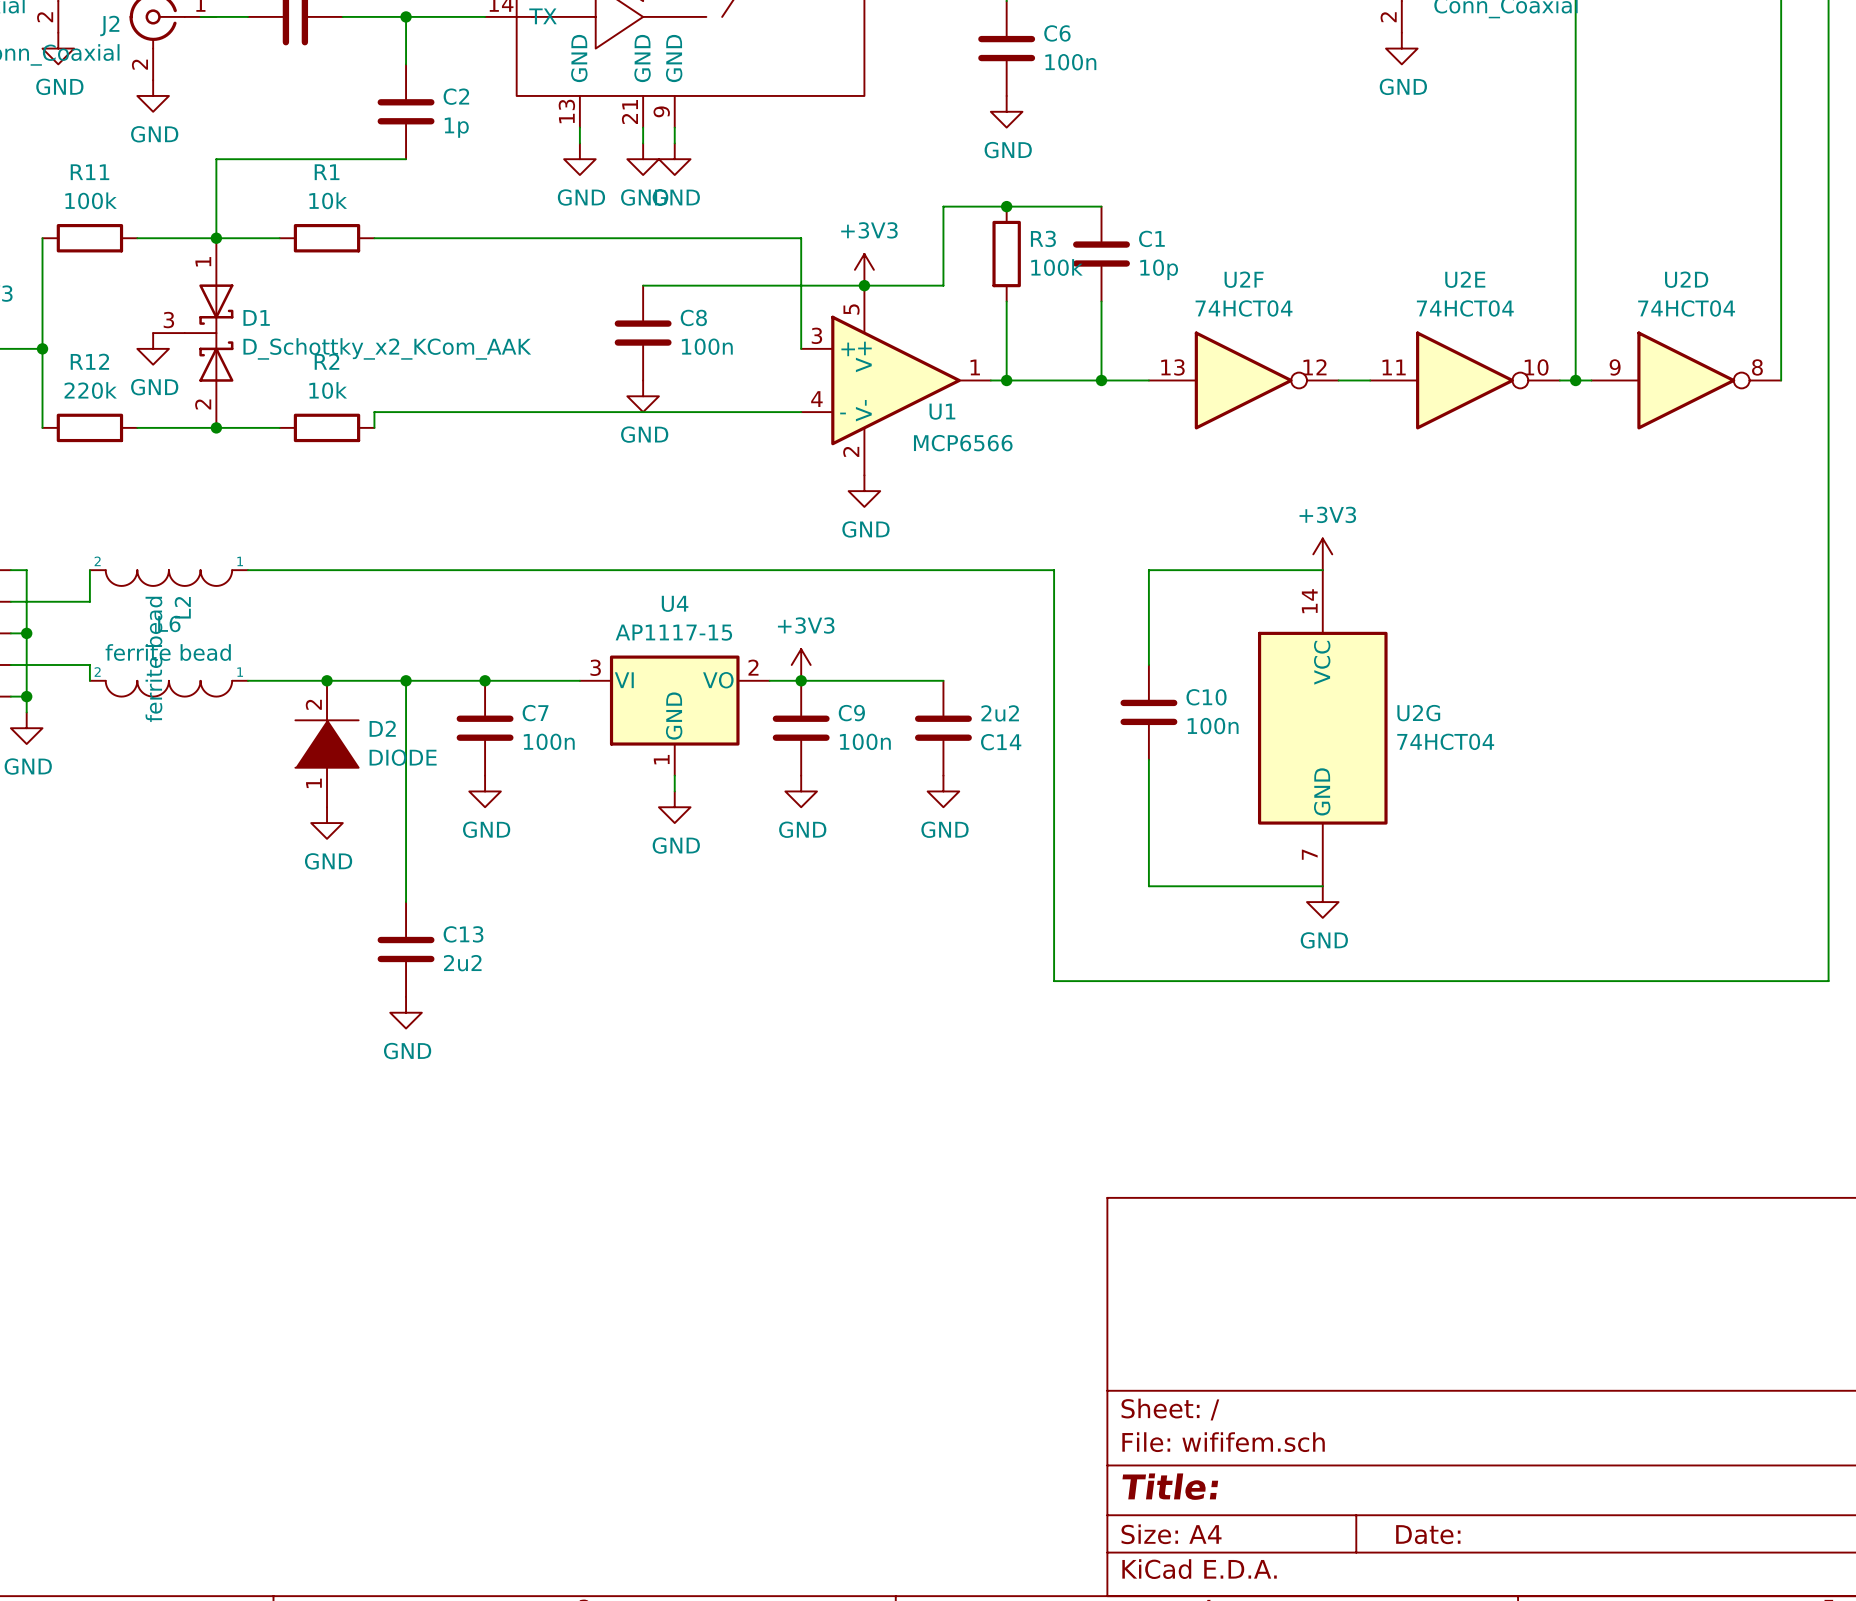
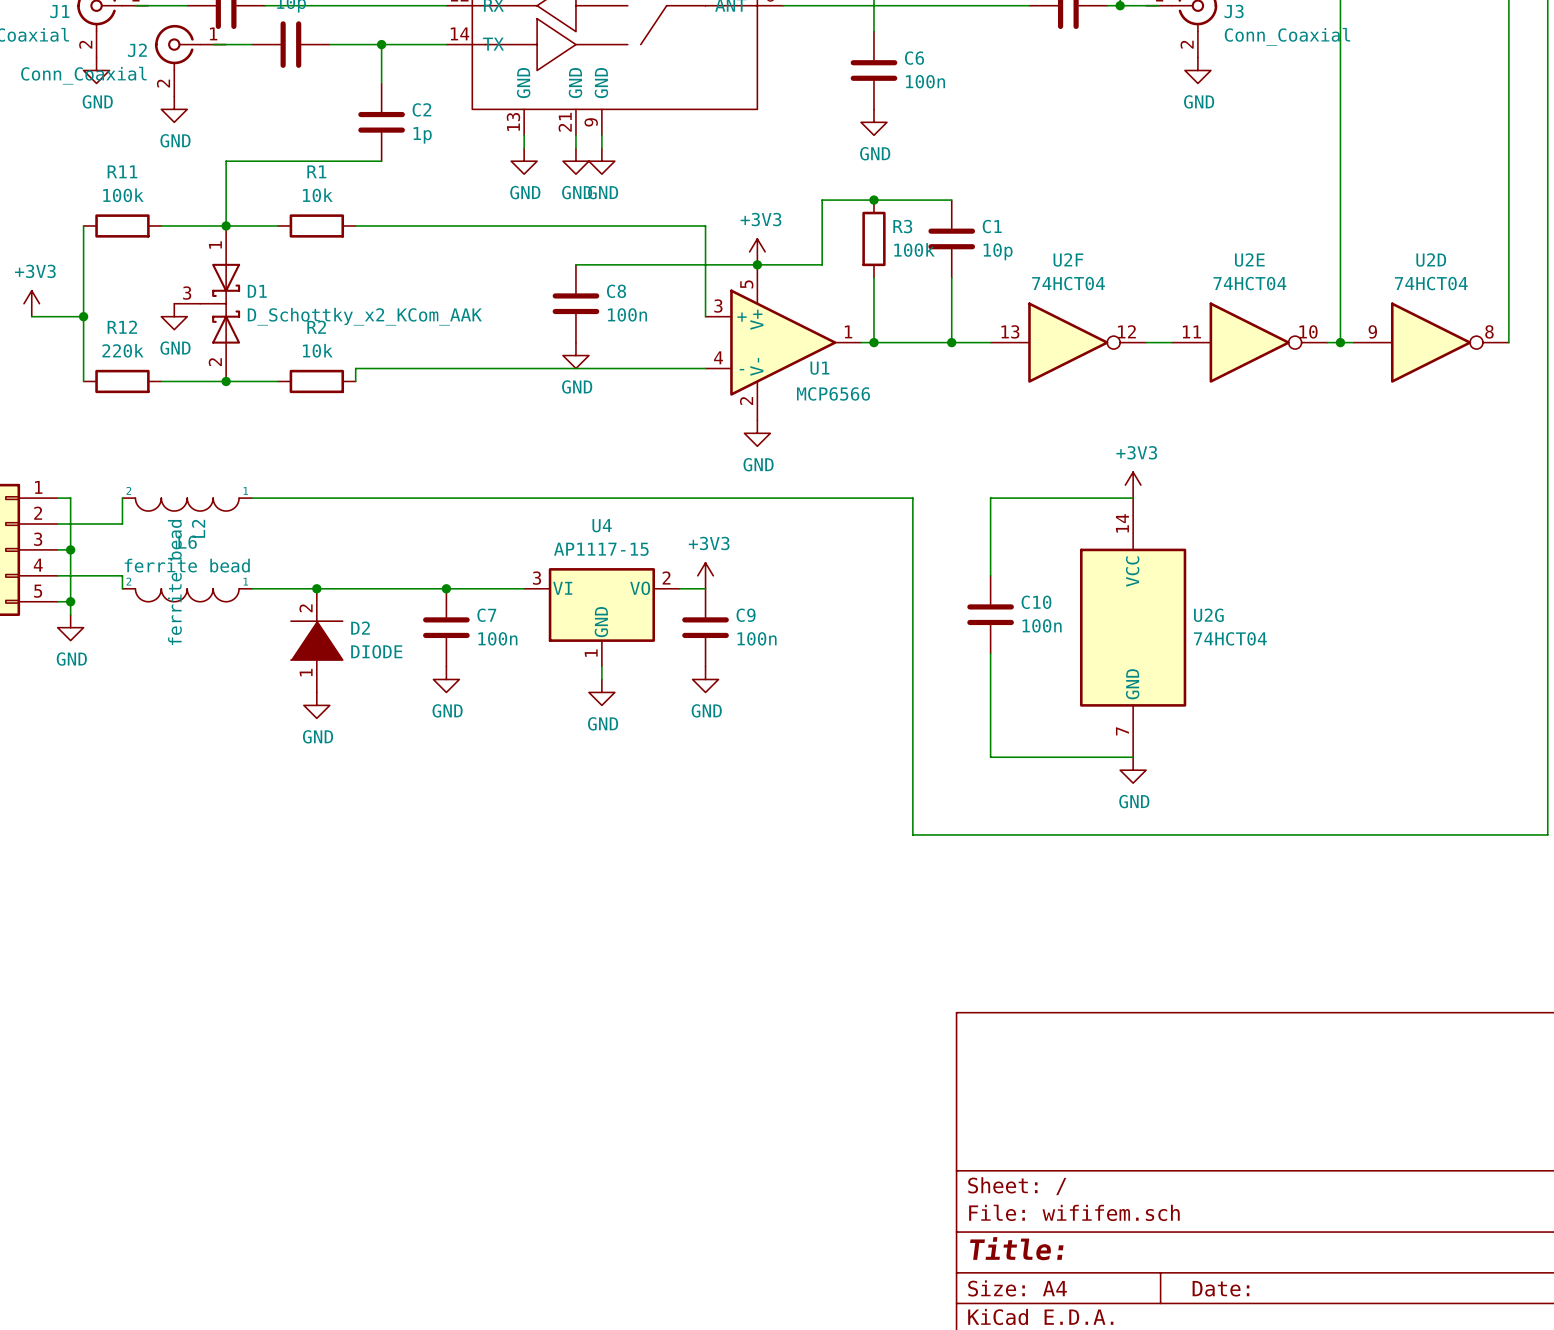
wire: (406, 680) (406, 902) -> none
junction: (406, 680) -> none
wire: (801, 680) (943, 680) -> none
junction: (801, 680) -> none
C14: 2u2 (943, 728) -> none
power symbol: GND (943, 791) -> none
C13: 2u2 (406, 949) -> none
power symbol: GND (406, 1012) -> none

